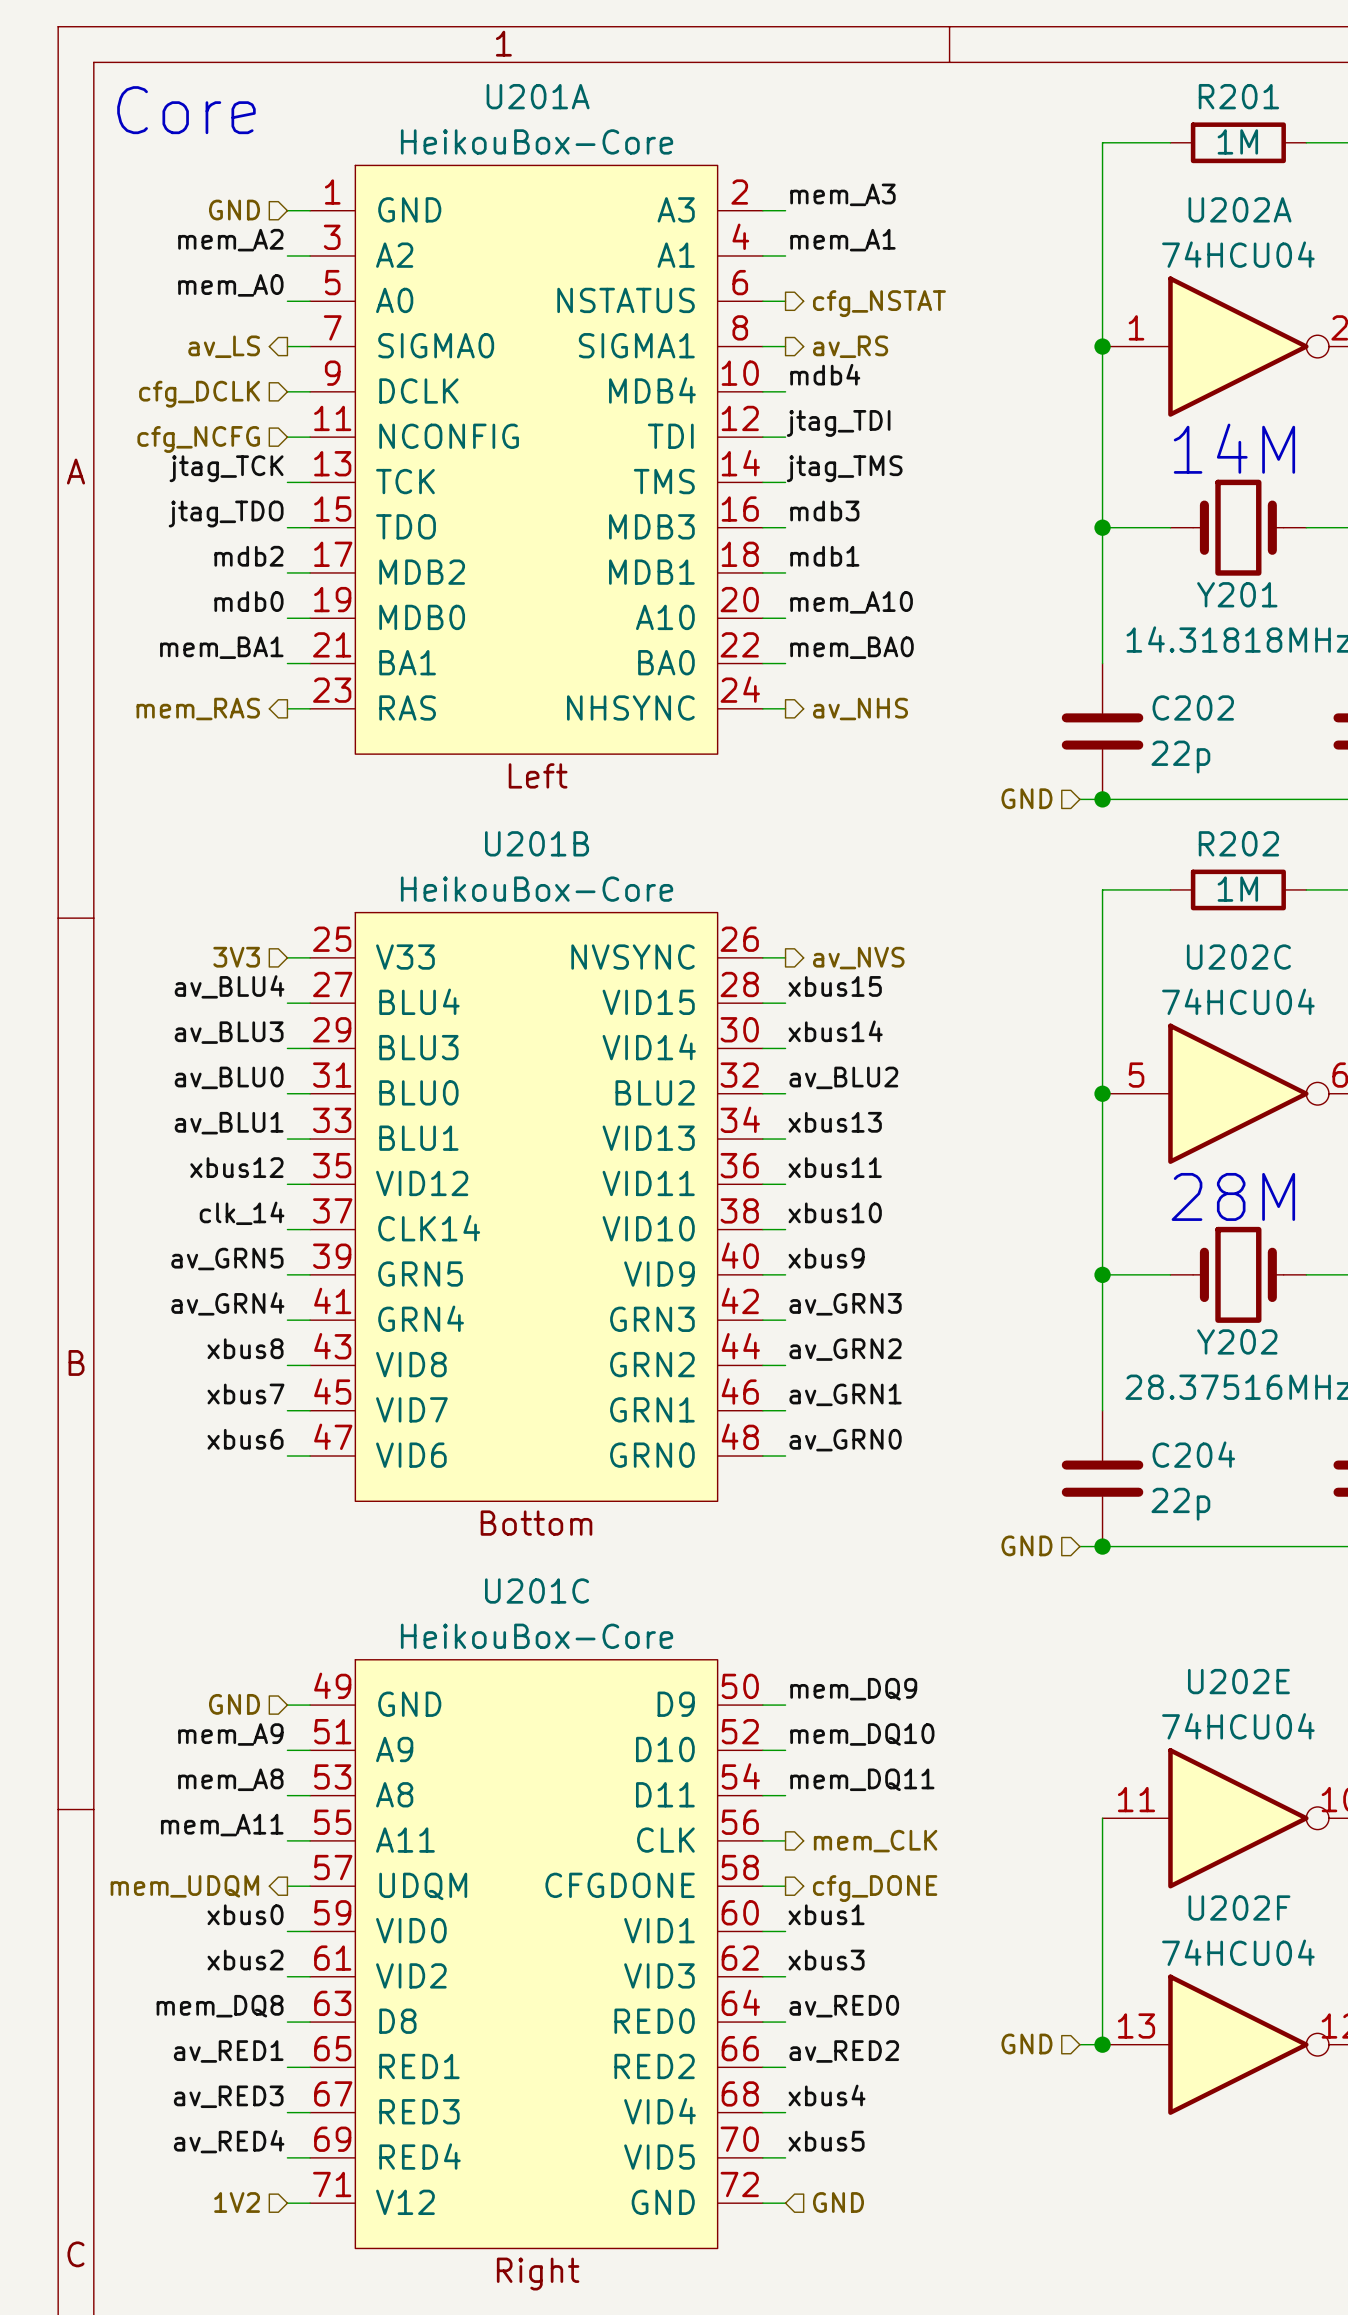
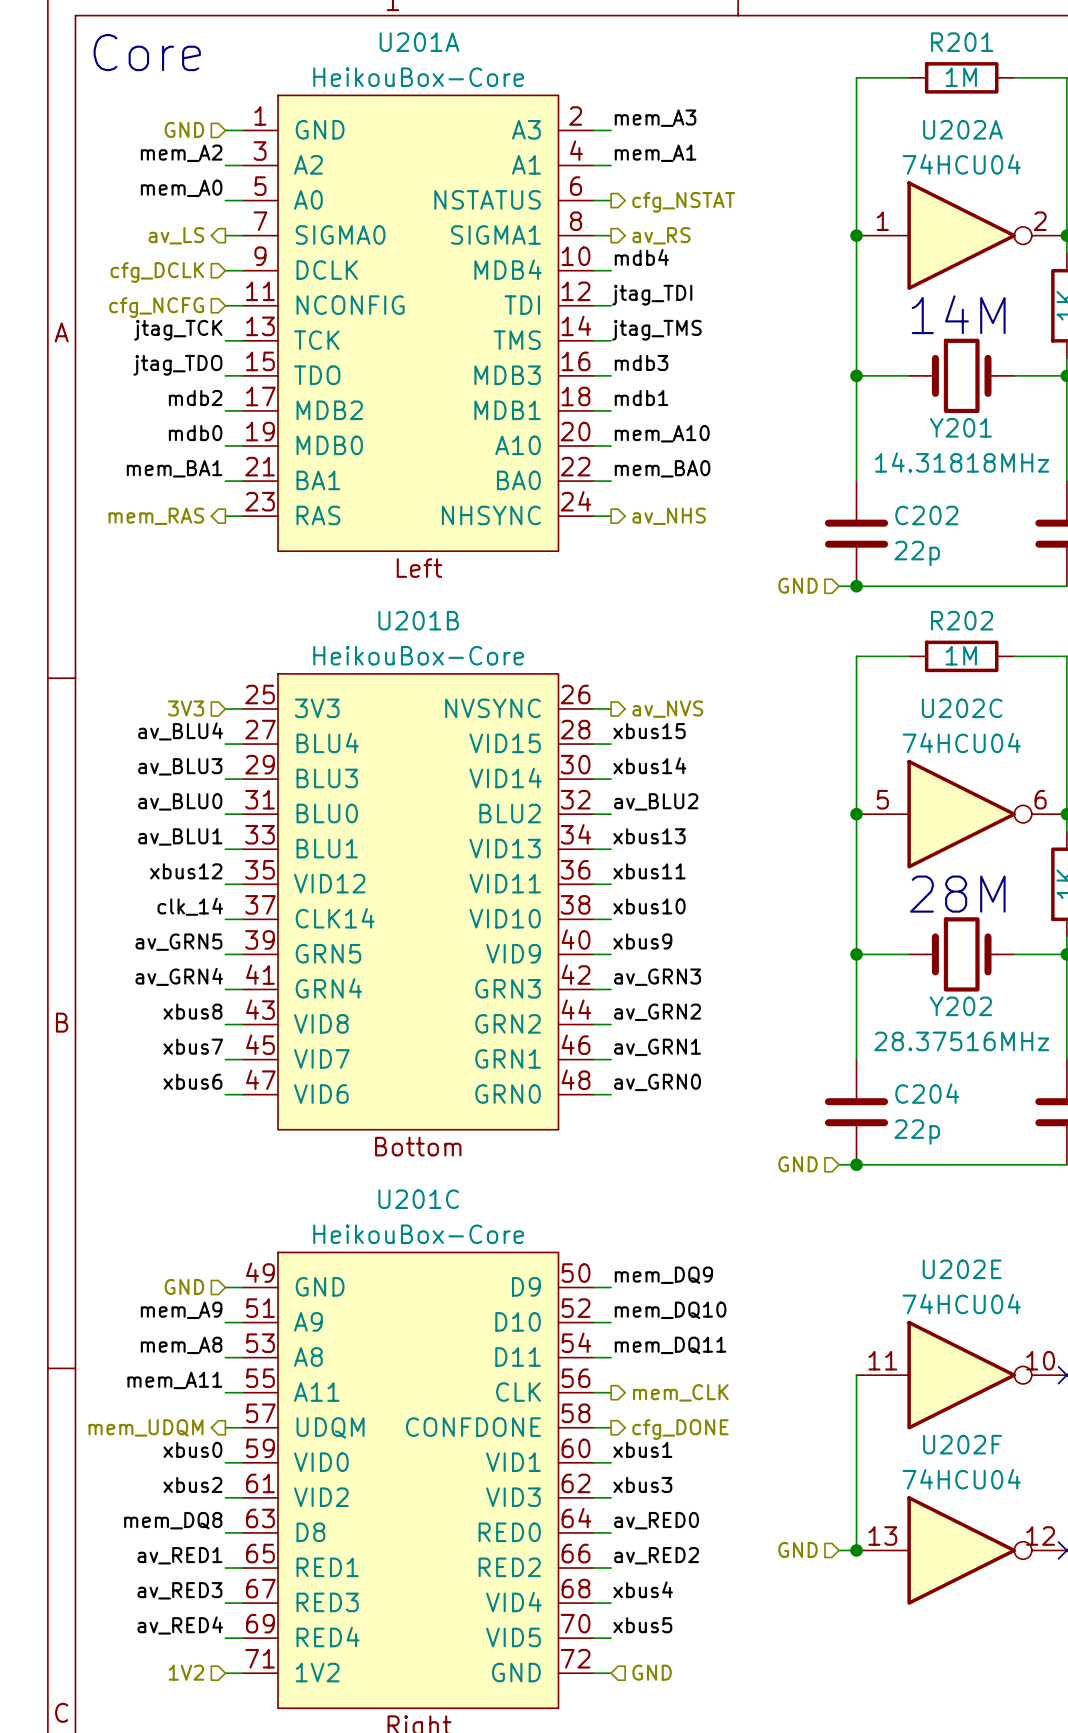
U201B pin name: V33 (405, 957) -> 3V3 (317, 708)
U201C pin name: CFGDONE (620, 1885) -> CONFDONE (473, 1427)
U201C pin name: V12 (405, 2202) -> 1V2 (317, 1672)

